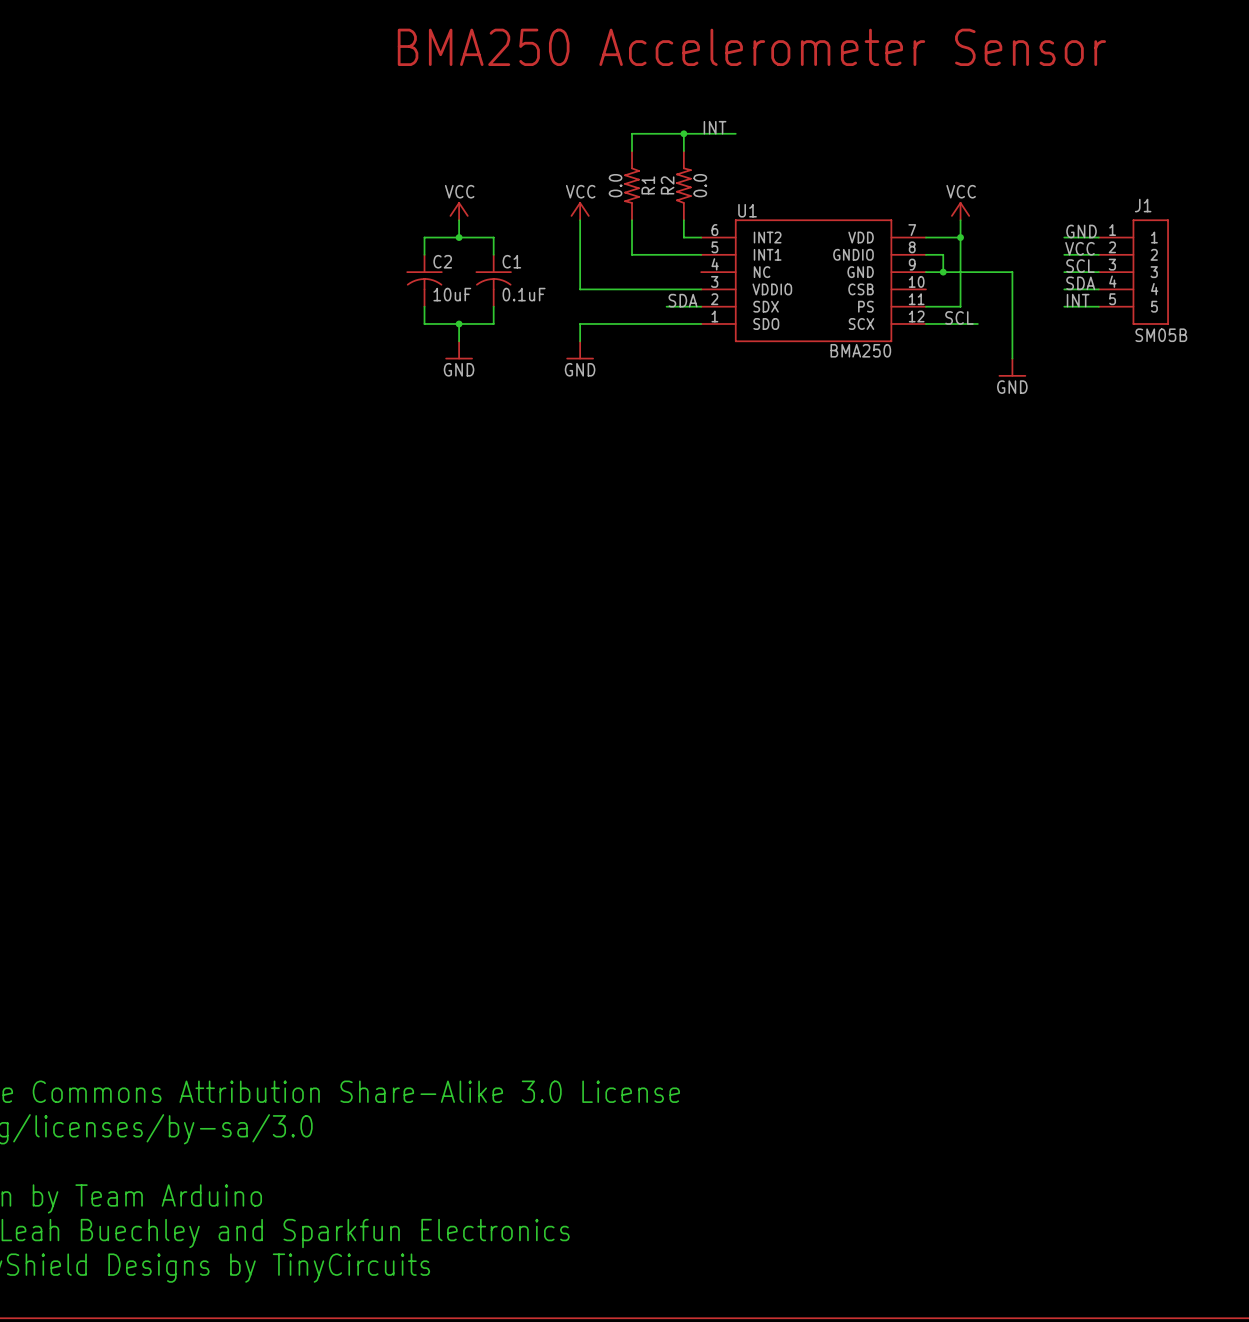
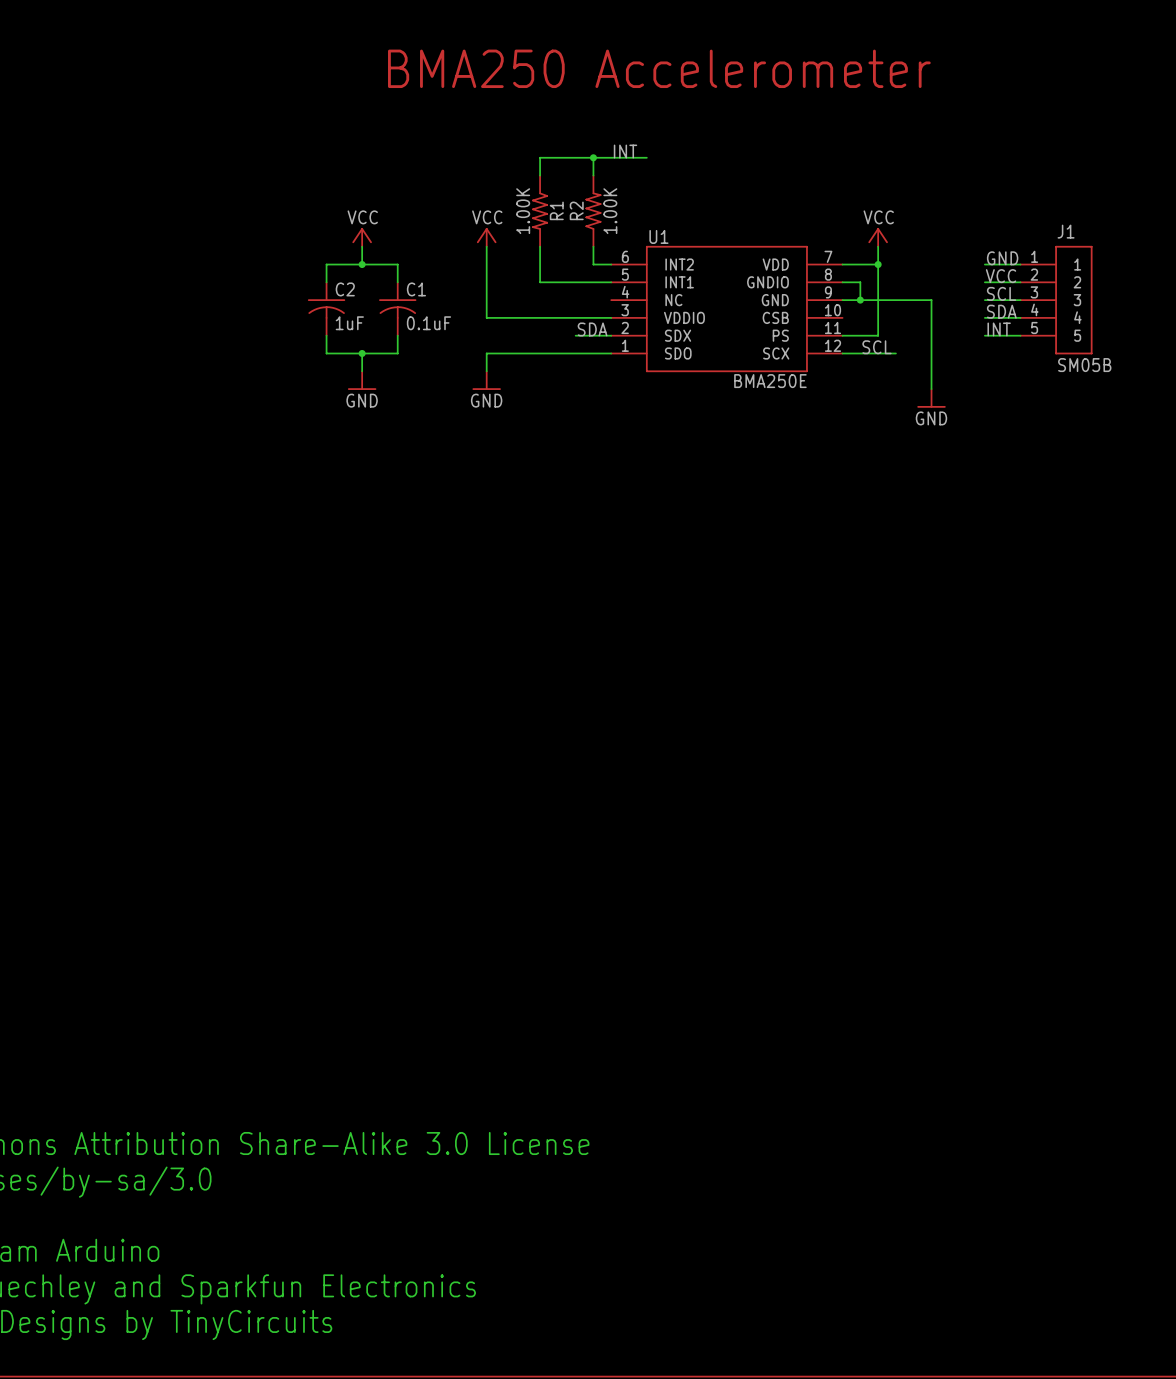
text: BMA250 Accelerometer Sensor (751, 47) -> BMA250 Accelerometer (659, 68)
R1 value: 0.0 (615, 185) -> 1.00K (523, 211)
R2 value: 0.0 (700, 185) -> 1.00K (610, 211)
C2 value: 10uF (452, 294) -> 1uF (349, 323)
U1 value: BMA250 (860, 350) -> BMA250E (770, 381)

